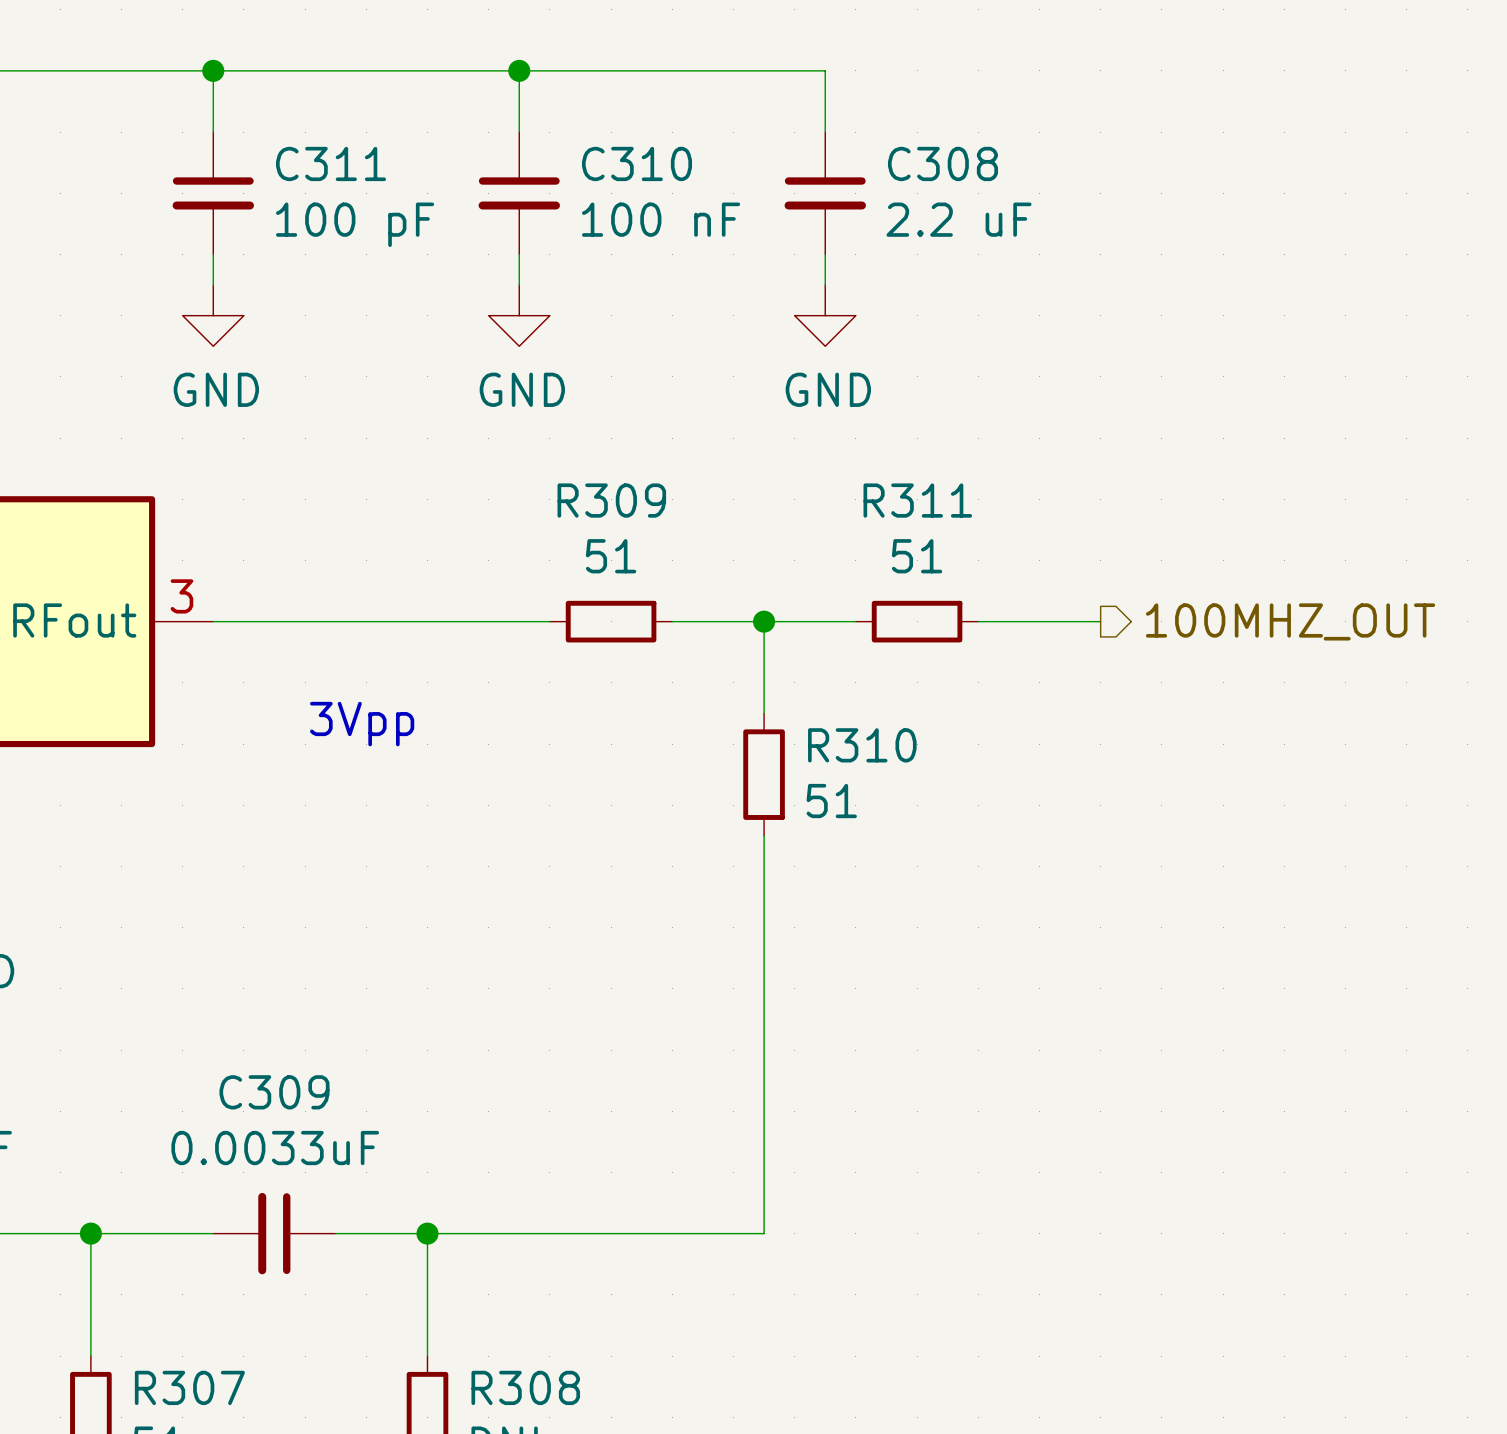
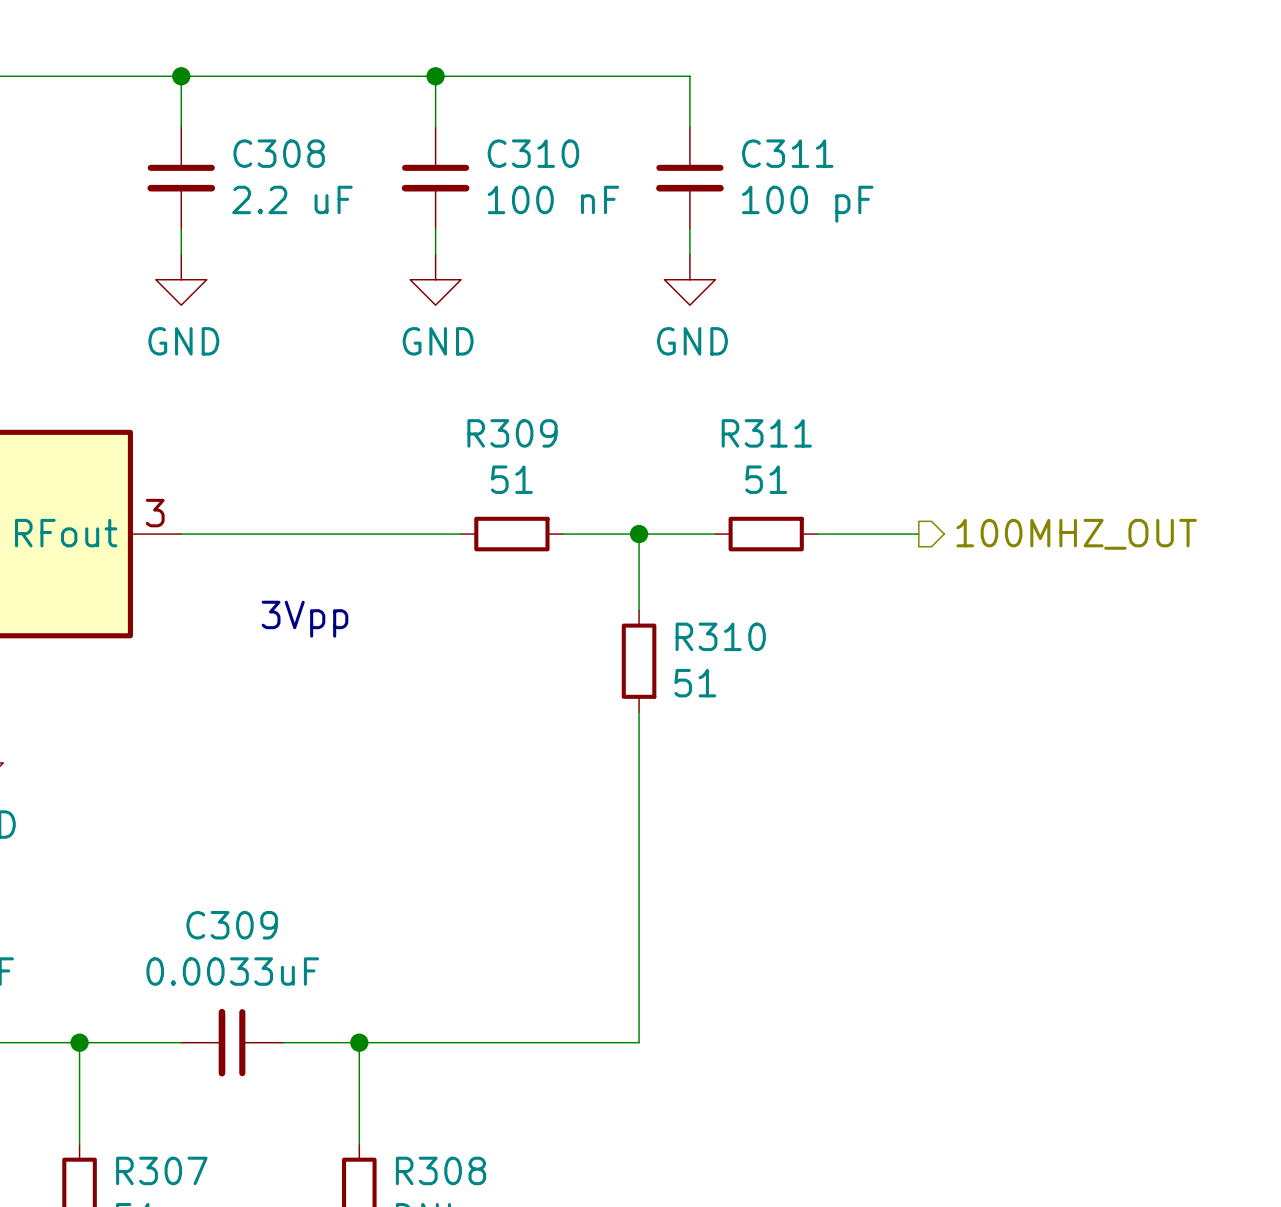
C311 name: C311 (331, 163) -> C308 (279, 153)
C308 name: C308 (942, 163) -> C311 (787, 153)
C308 value: 2.2 uF (959, 219) -> 100 pF (807, 204)
C311 value: 100 pF (355, 224) -> 2.2 uF (292, 199)

